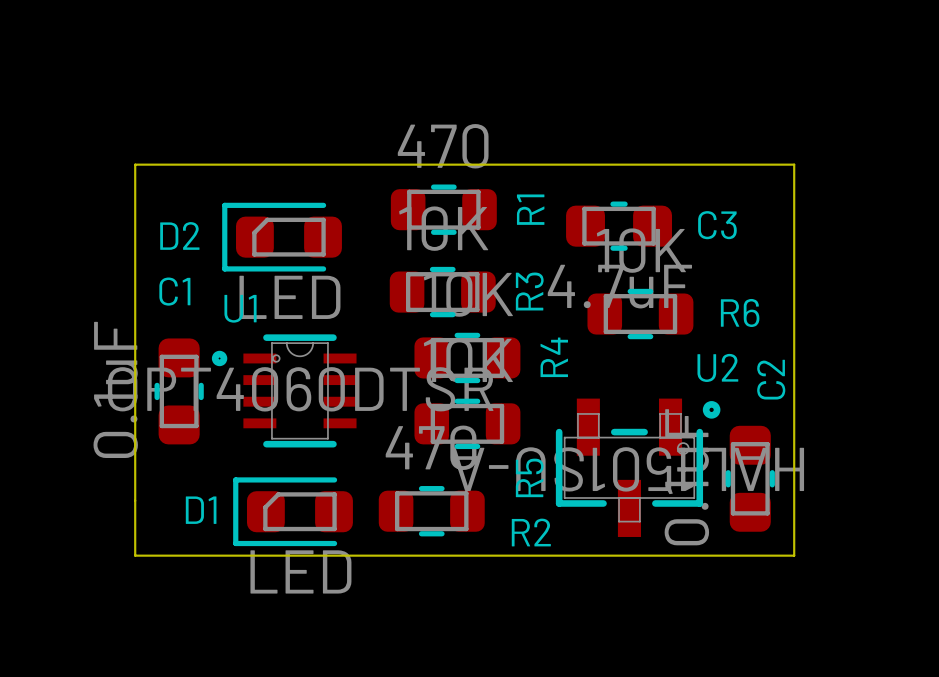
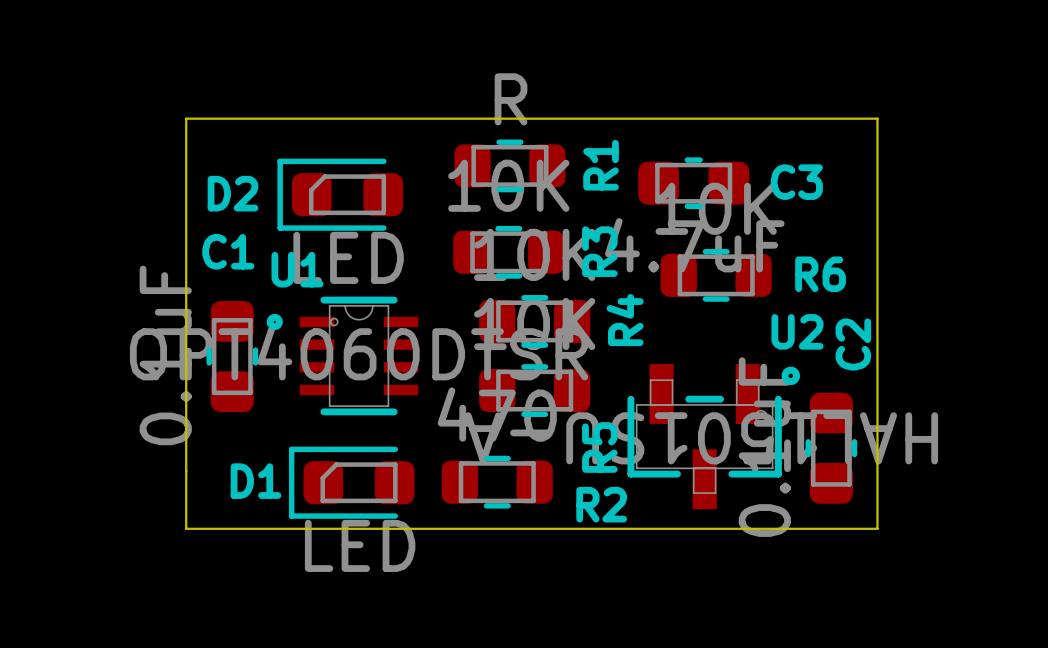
R1 value: 470 (443, 146) -> R (511, 99)

